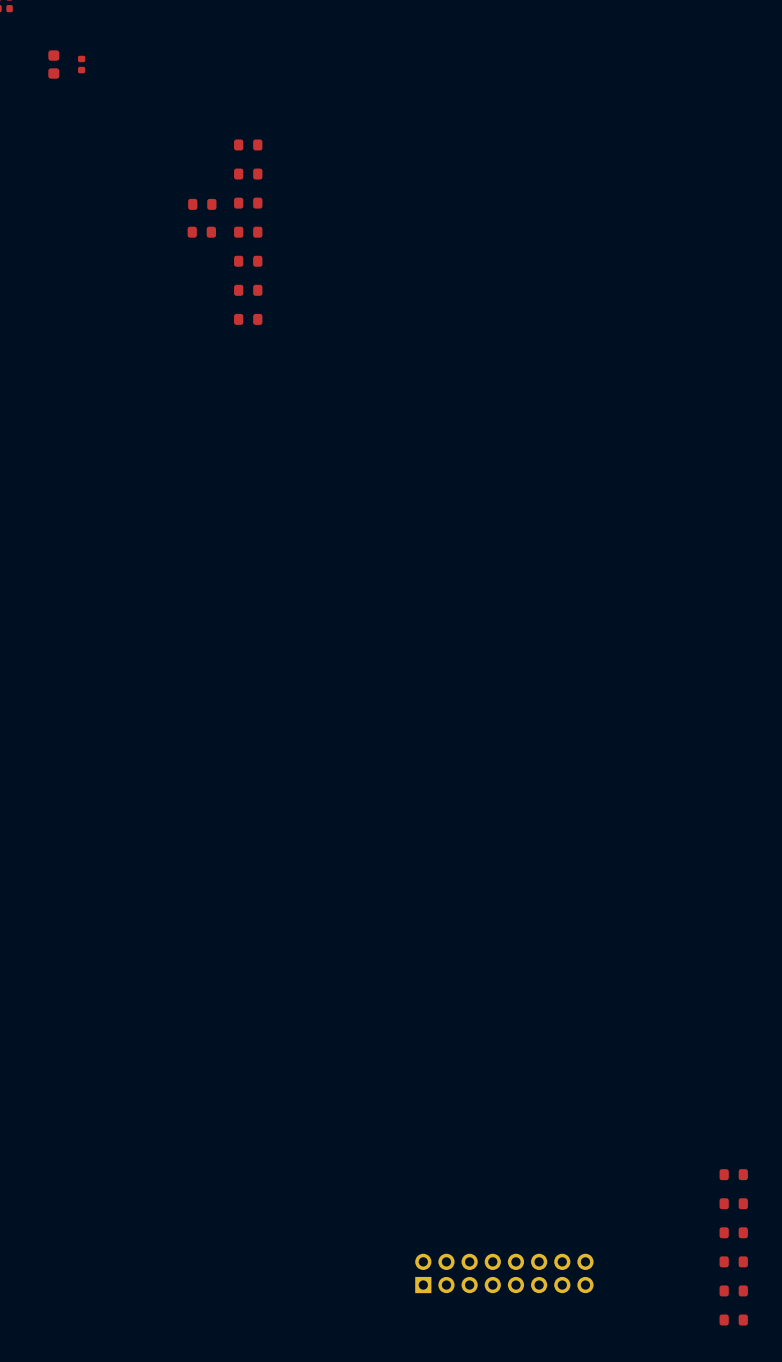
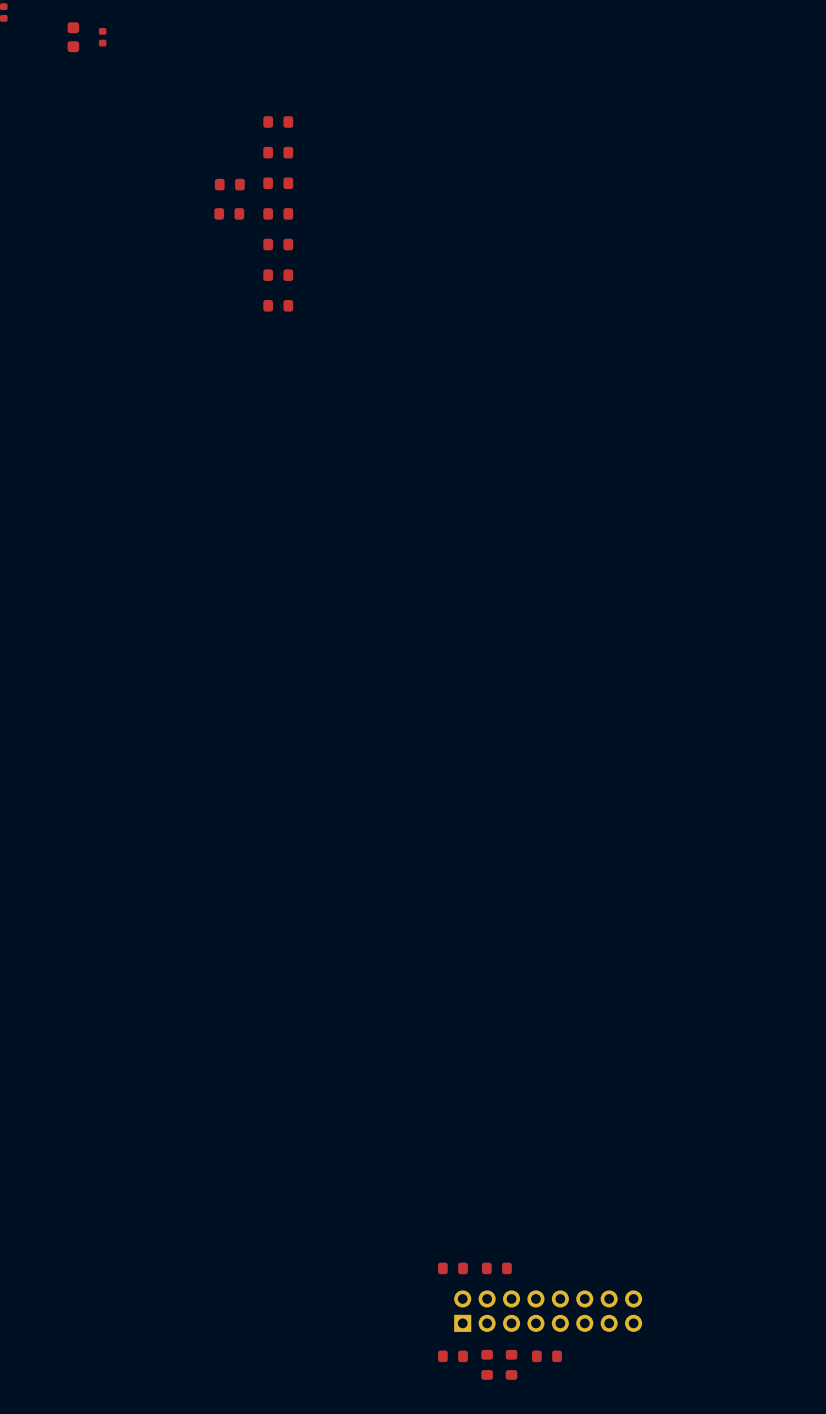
part: (733, 1174) -> none
part: (733, 1203) -> none
part: none -> (452, 1268)
part: none -> (496, 1268)
part: (733, 1232) -> none
part: (733, 1261) -> none
part: (733, 1290) -> none
part: none -> (452, 1356)
part: none -> (546, 1356)
part: (733, 1320) -> none
part: none -> (487, 1364)
part: none -> (511, 1364)

